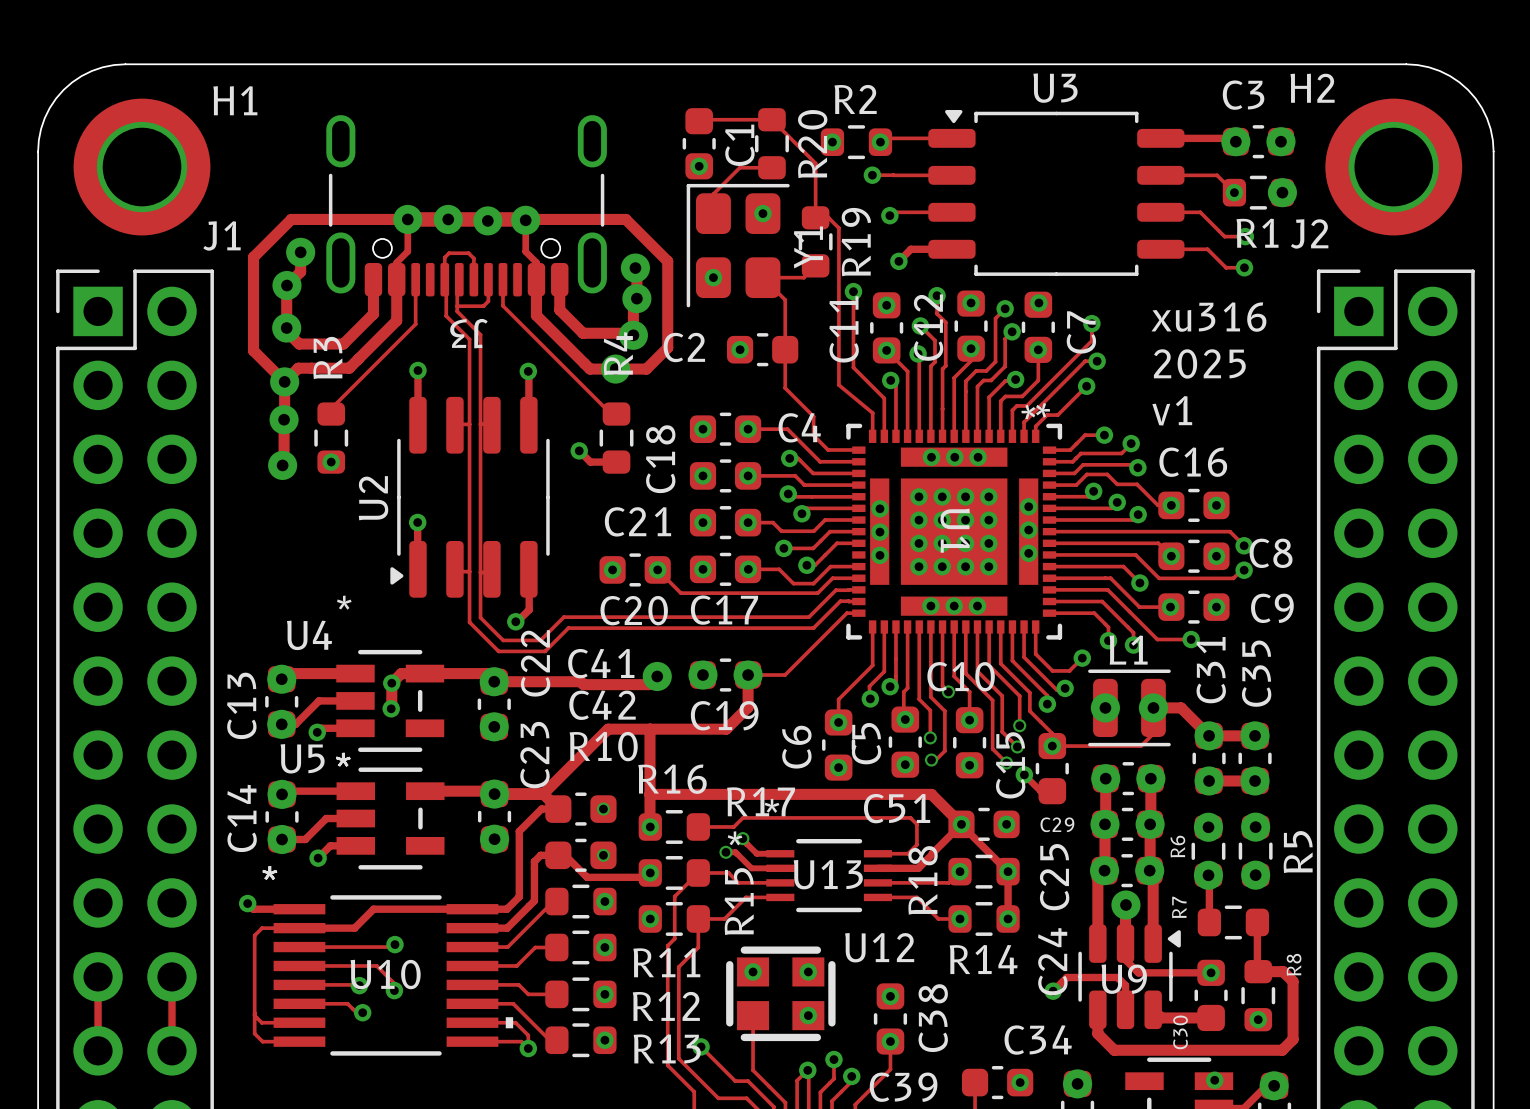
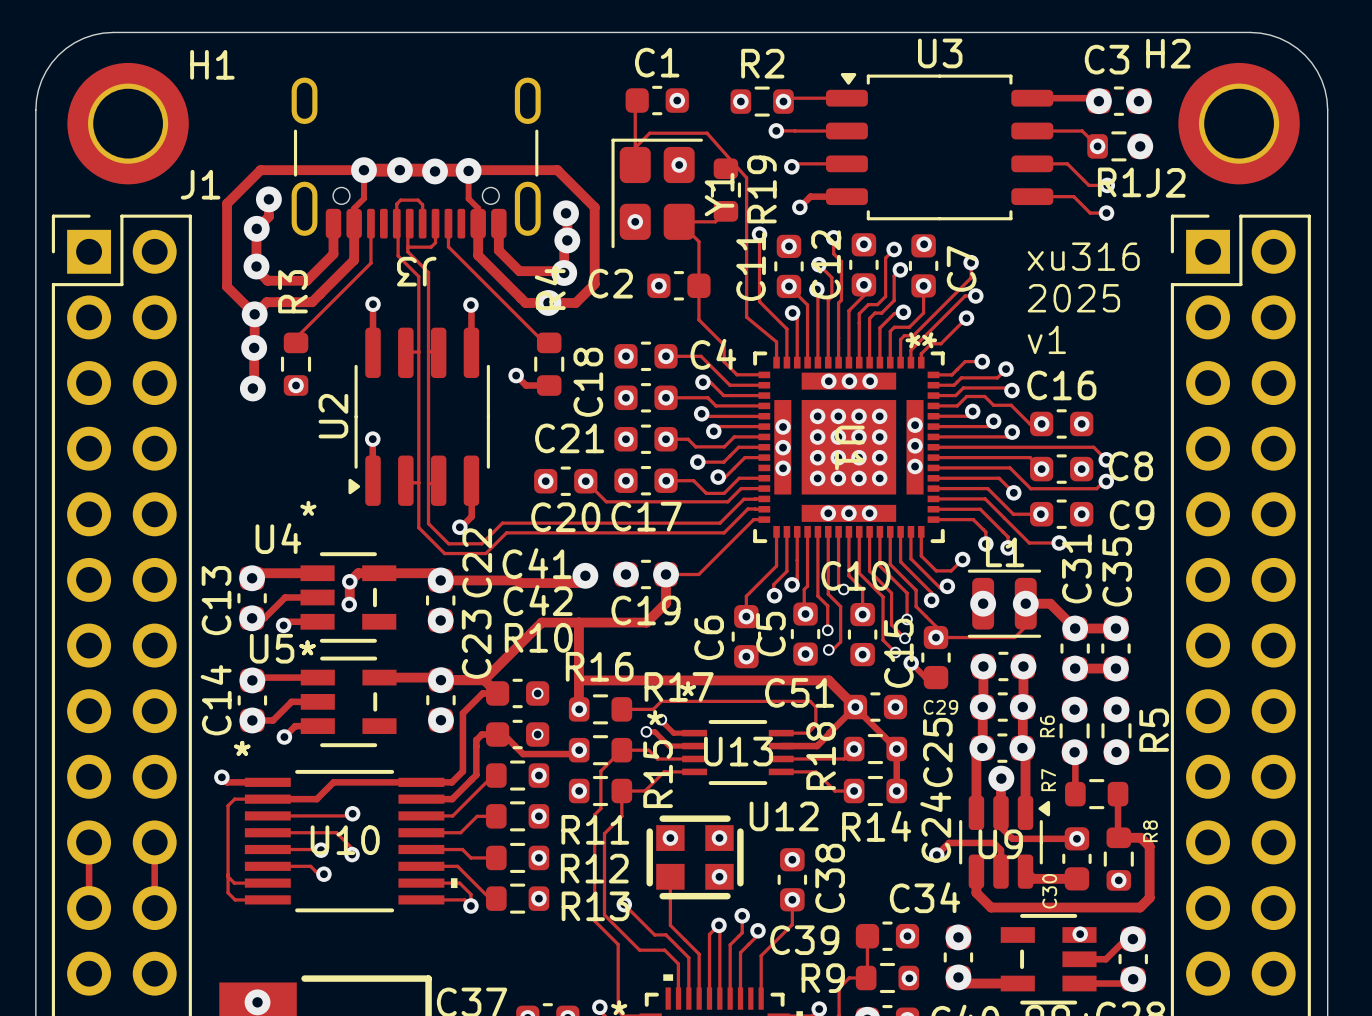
track: (699, 121) (771, 119) (815, 163) (815, 217) (828, 217) (838, 228) -> (649, 133) (707, 133) (746, 177)
track: none -> (637, 100) (635, 102) (635, 147)
C1 rotation: 0° (699, 143) -> 90° clockwise (657, 100)
R20: (771, 143) -> none
C1 name position: C1 (739, 145) -> C1 (657, 62)
via position: (699, 166) -> (677, 100)
track: (771, 167) (739, 167) (729, 177) -> none

